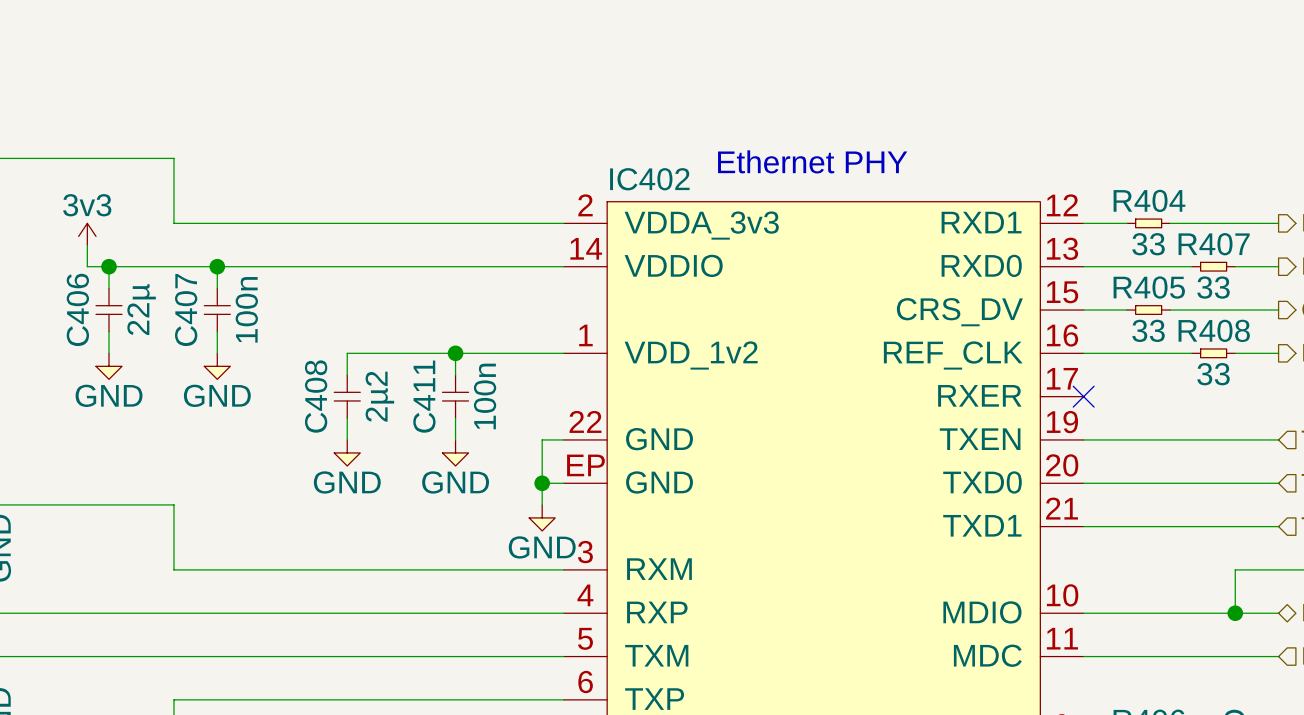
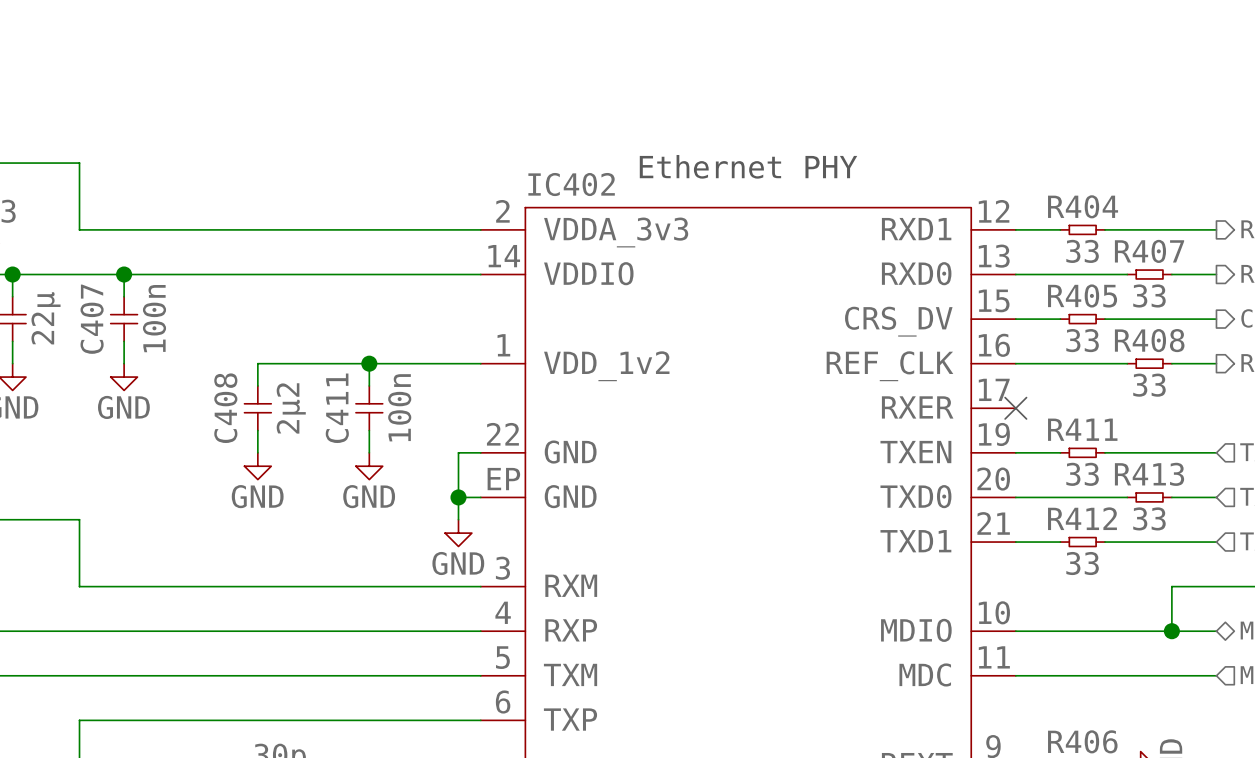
R411: none -> 33 (1082, 452)
R413: none -> 33 (1149, 497)
R412: none -> 33 (1082, 542)

